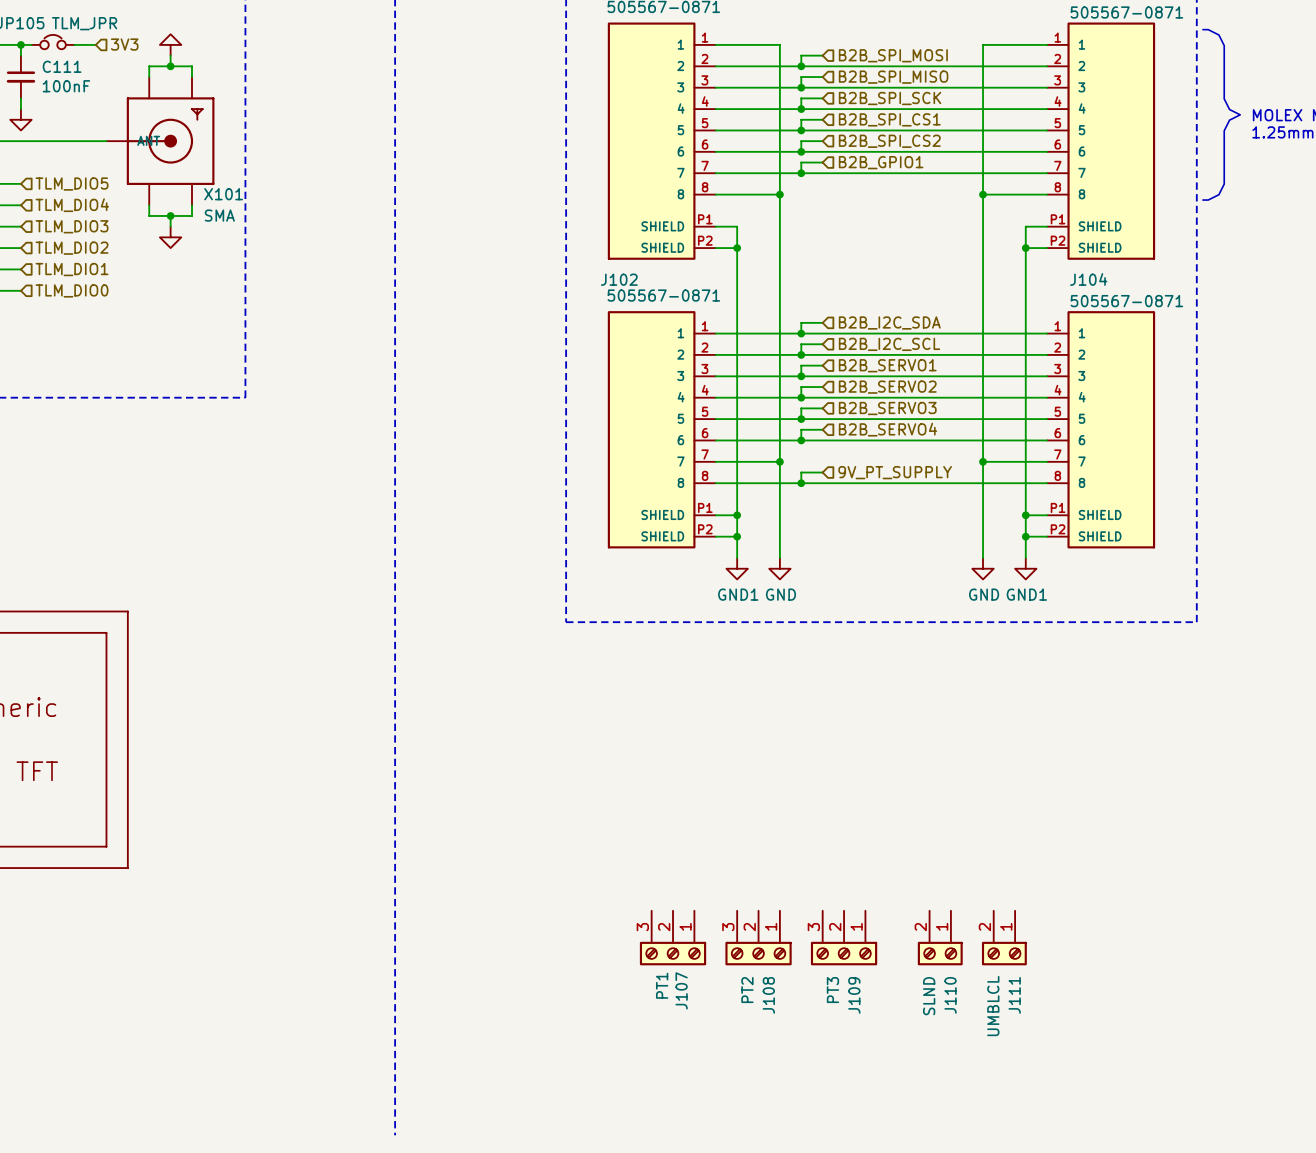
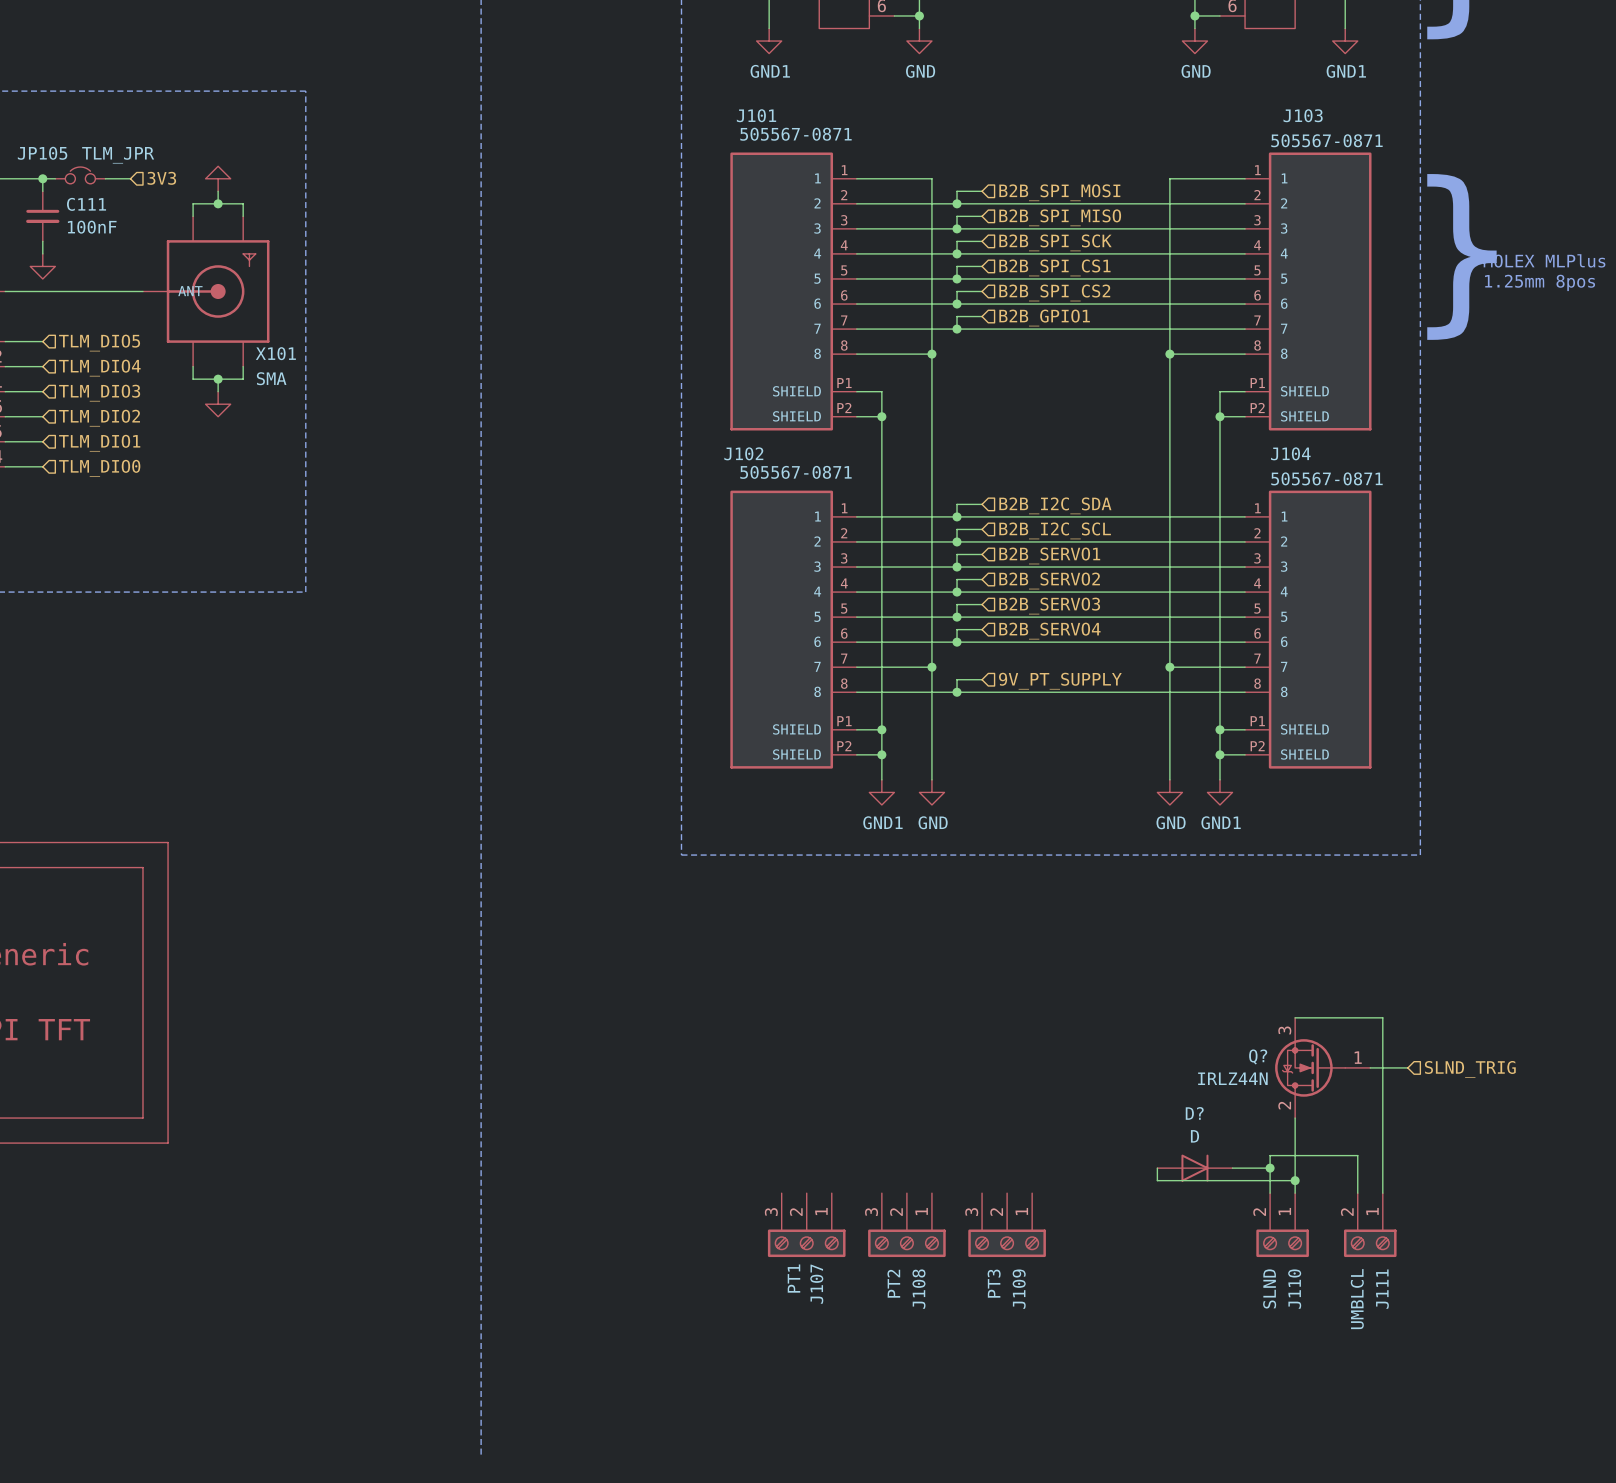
wire: none -> (1295, 1017) (1382, 1017) (1382, 1193)
Q?: none -> IRLZ44N (1322, 1067)
wire: none -> (1370, 1067) (1407, 1067)
hierarchical label: none -> SLND_TRIG (1470, 1069)
wire: none -> (1295, 1118) (1295, 1193)
wire: none -> (1157, 1168) (1157, 1180) (1295, 1180)
D?: none -> D (1194, 1168)
wire: none -> (1232, 1168) (1270, 1168)
junction: none -> (1270, 1168)
junction: none -> (1295, 1180)
wire: none -> (1270, 1193) (1270, 1155) (1357, 1155) (1357, 1193)
J110 position: (940, 938) -> (1282, 1225)
J111 position: (1004, 938) -> (1370, 1225)

